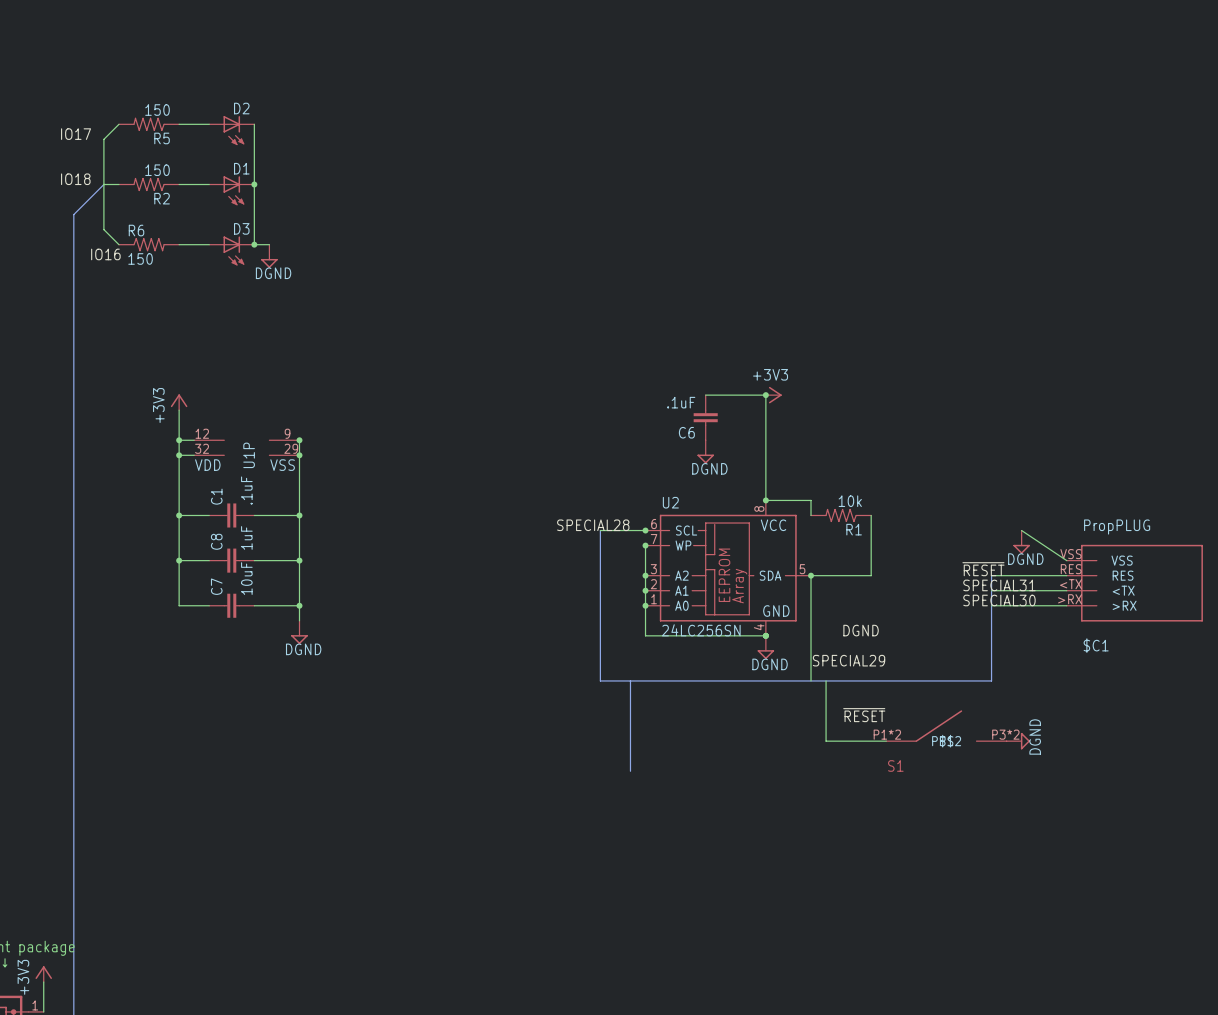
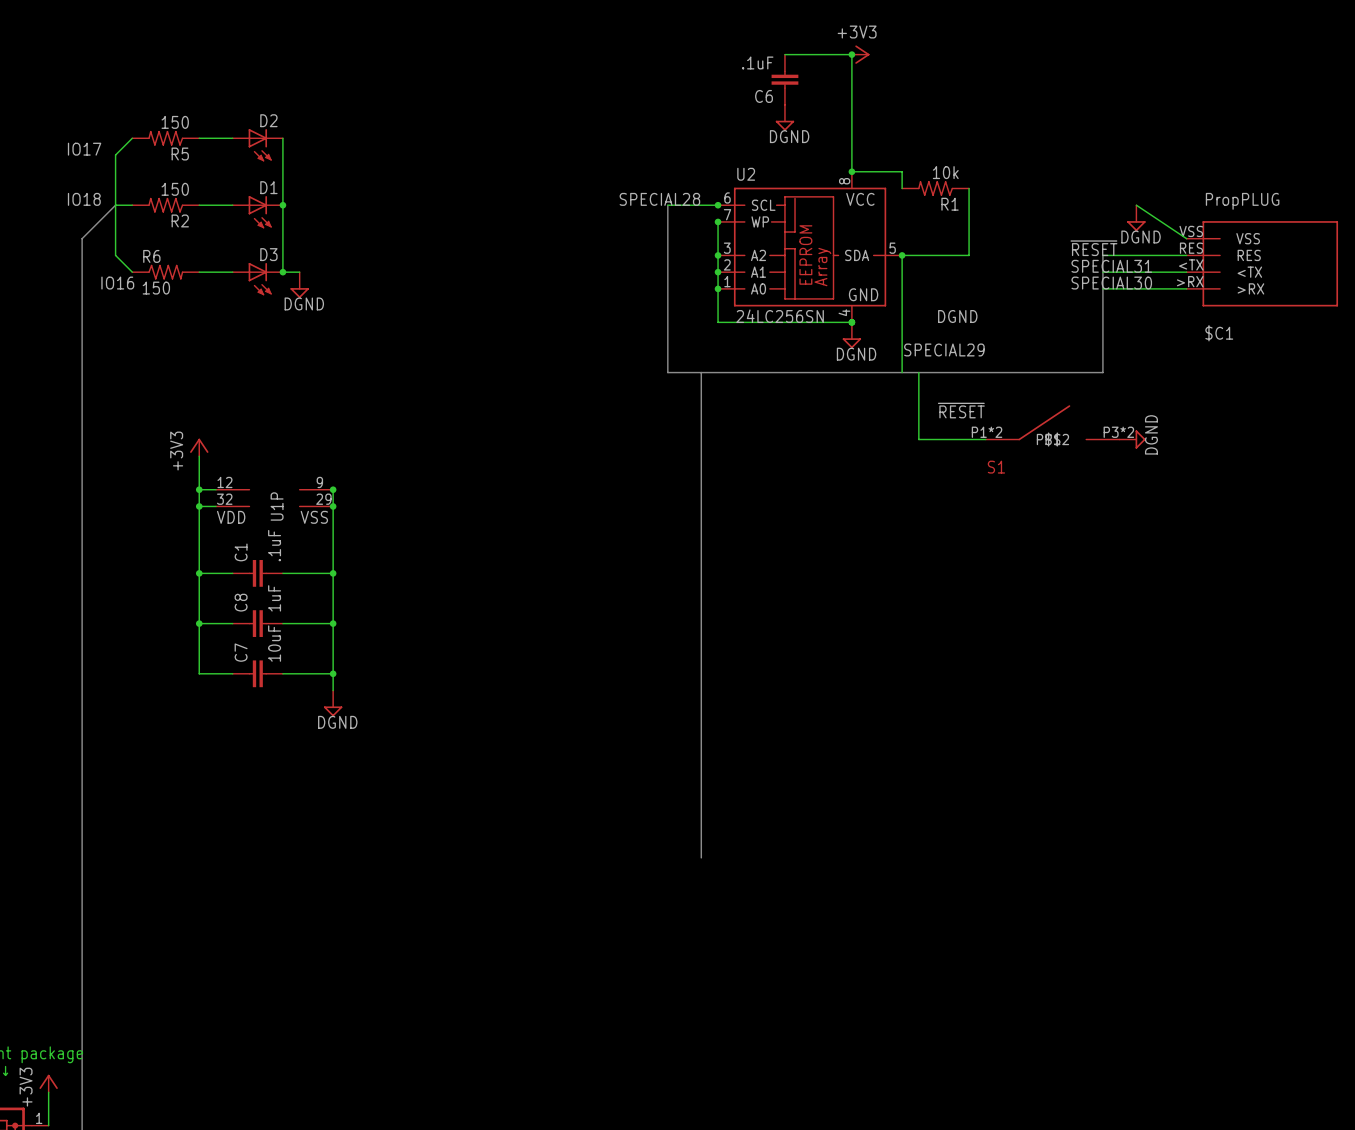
wire: none -> (784, 54) (851, 54) (851, 171) (902, 171) (902, 188)
junction: none -> (851, 54)
power symbol: none -> +3V3 (860, 54)
power symbol: none -> DGND (784, 117)
junction: none -> (851, 171)
wire: none -> (969, 188) (969, 255) (902, 255) (902, 372)
label: none -> SPECIAL28 (659, 199)
bus: none -> (667, 205) (667, 372) (1102, 372) (1102, 255)
wire: none -> (667, 205) (718, 205)
junction: none -> (718, 205)
wire: none -> (1136, 205) (1186, 238)
power symbol: none -> DGND (1136, 218)
wire: none -> (718, 221) (718, 322) (851, 322)
junction: none -> (718, 221)
label: none -> ~{RESET} (1093, 248)
junction: none -> (718, 255)
junction: none -> (902, 255)
wire: none -> (1102, 255) (1186, 255)
part: none -> (1262, 263)
label: none -> SPECIAL31 (1111, 266)
junction: none -> (718, 272)
wire: none -> (1102, 272) (1186, 272)
label: none -> SPECIAL30 (1111, 283)
junction: none -> (718, 288)
wire: none -> (1102, 288) (1186, 288)
label: none -> DGND (957, 316)
junction: none -> (851, 322)
power symbol: none -> DGND (851, 335)
label: none -> SPECIAL29 (944, 349)
bus: none -> (701, 372) (701, 757)
wire: none -> (918, 372) (918, 439) (985, 439)
label: none -> ~{RESET} (961, 410)
wire: (705, 395) (765, 395) (765, 500) (811, 500) (811, 515) -> none
junction: (765, 395) -> none
power symbol: +3V3 (773, 395) -> none
C6 position: (705, 417) -> (784, 79)
power symbol: DGND (705, 451) -> none
junction: (765, 500) -> none
R1 position: (841, 515) -> (935, 188)
wire: (871, 515) (871, 575) (811, 575) (811, 680) -> none
label: SPECIAL28 (593, 525) -> none
bus: (600, 530) (600, 680) (991, 680) (991, 575) -> none
wire: (600, 530) (645, 530) -> none
junction: (645, 530) -> none
wire: (1021, 530) (1066, 560) -> none
power symbol position: DGND (1021, 542) -> DGND (1132, 439)
wire: (645, 545) (645, 635) (765, 635) -> none
junction: (645, 545) -> none
power symbol rotation: 0° (1021, 549) -> 90° counterclockwise (1140, 439)
U2 position: (728, 568) -> (810, 247)
label: ~{RESET} (983, 569) -> none
junction: (645, 575) -> none
junction: (811, 575) -> none
wire: (991, 575) (1066, 575) -> none
part: (1134, 583) -> none
label: SPECIAL31 (999, 585) -> none
junction: (645, 590) -> none
wire: (991, 590) (1066, 590) -> none
label: SPECIAL30 (999, 600) -> none
junction: (645, 605) -> none
wire: (991, 605) (1066, 605) -> none
label: DGND (861, 630) -> none
junction: (765, 635) -> none
power symbol: DGND (765, 647) -> none
label: SPECIAL29 (849, 660) -> none
wire: (826, 680) (826, 741) (886, 741) -> none
label: ~{RESET} (864, 715) -> none
S1 position: (946, 726) -> (1052, 422)
power symbol: DGND (1018, 741) -> none

